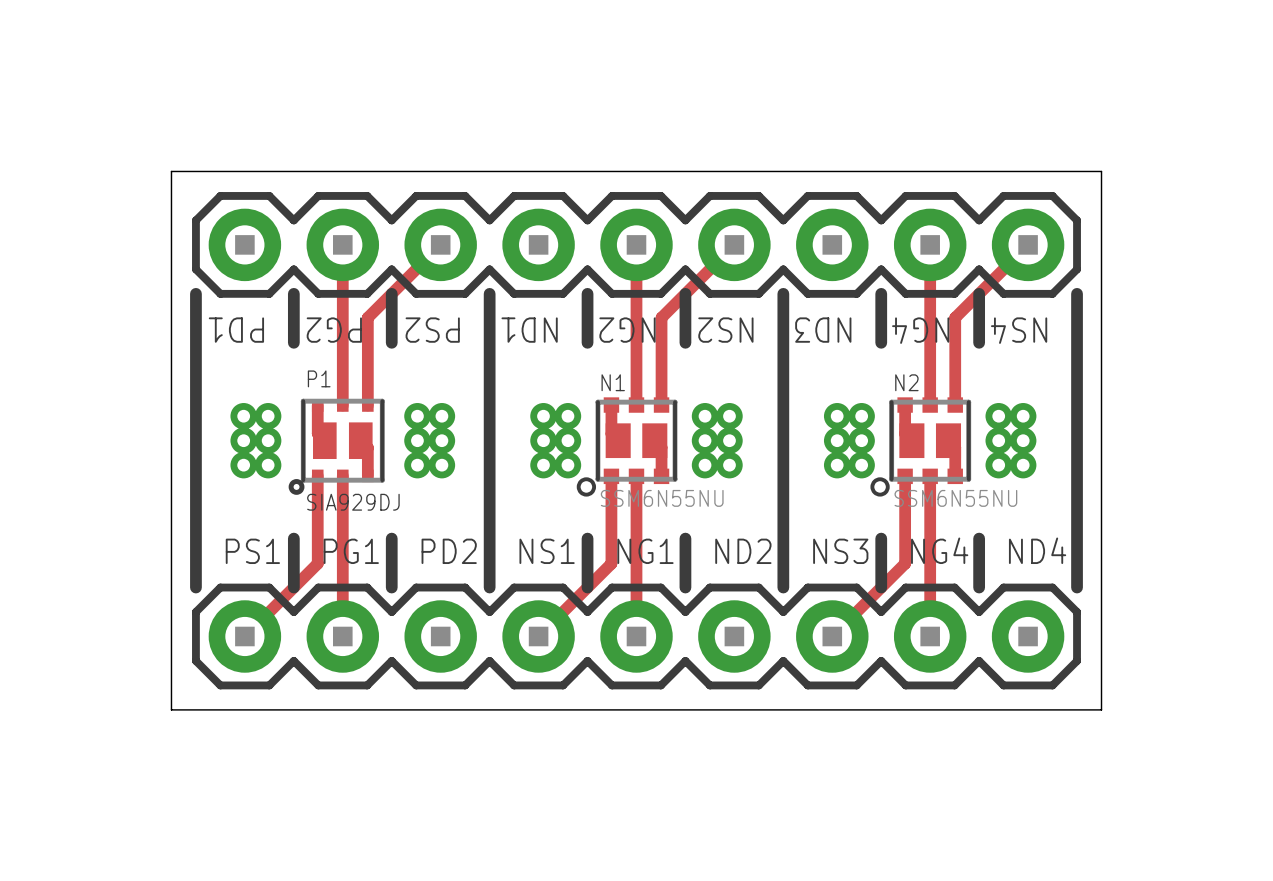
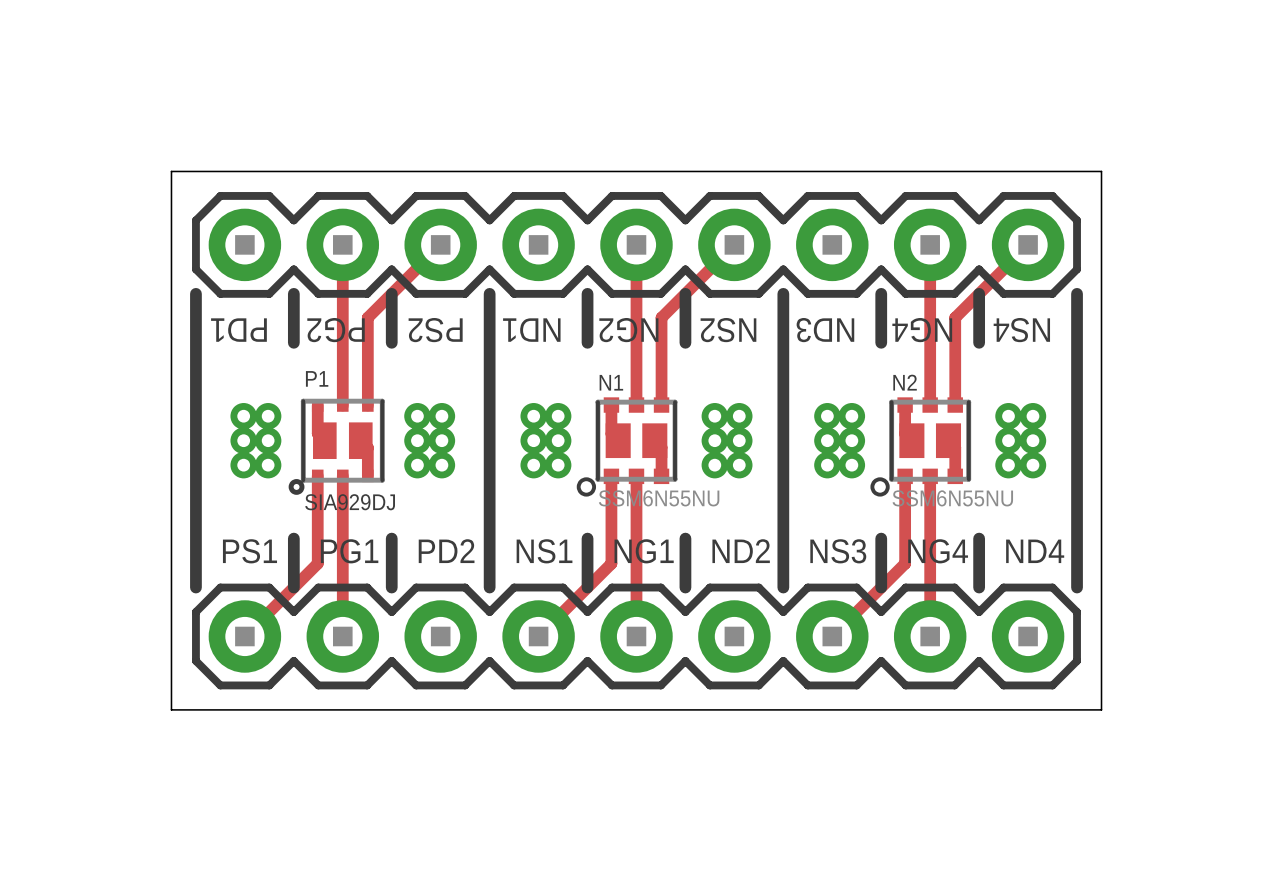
via: none -> (533, 416)
via: (543, 416) -> none
via: none -> (558, 416)
via: (567, 416) -> none
via: (705, 416) -> none
via: none -> (714, 416)
via: (729, 416) -> none
via: none -> (739, 416)
via: none -> (827, 416)
via: (837, 416) -> none
via: none -> (851, 416)
via: (861, 416) -> none
via: (998, 416) -> none
via: none -> (1008, 416)
via: (1023, 416) -> none
via: none -> (1032, 416)
via: none -> (533, 440)
via: (543, 440) -> none
via: none -> (558, 440)
via: (567, 440) -> none
via: (705, 440) -> none
via: none -> (714, 440)
via: (729, 440) -> none
via: none -> (739, 440)
via: none -> (827, 440)
via: (837, 440) -> none
via: none -> (851, 440)
via: (861, 440) -> none
via: (998, 440) -> none
via: none -> (1008, 440)
via: (1023, 440) -> none
via: none -> (1032, 440)
via: none -> (533, 465)
via: (543, 465) -> none
via: none -> (558, 465)
via: (567, 465) -> none
via: (705, 465) -> none
via: none -> (714, 465)
via: (729, 465) -> none
via: none -> (739, 465)
via: none -> (827, 465)
via: (837, 465) -> none
via: none -> (851, 465)
via: (861, 465) -> none
via: (998, 465) -> none
via: none -> (1008, 465)
via: (1023, 465) -> none
via: none -> (1032, 465)

